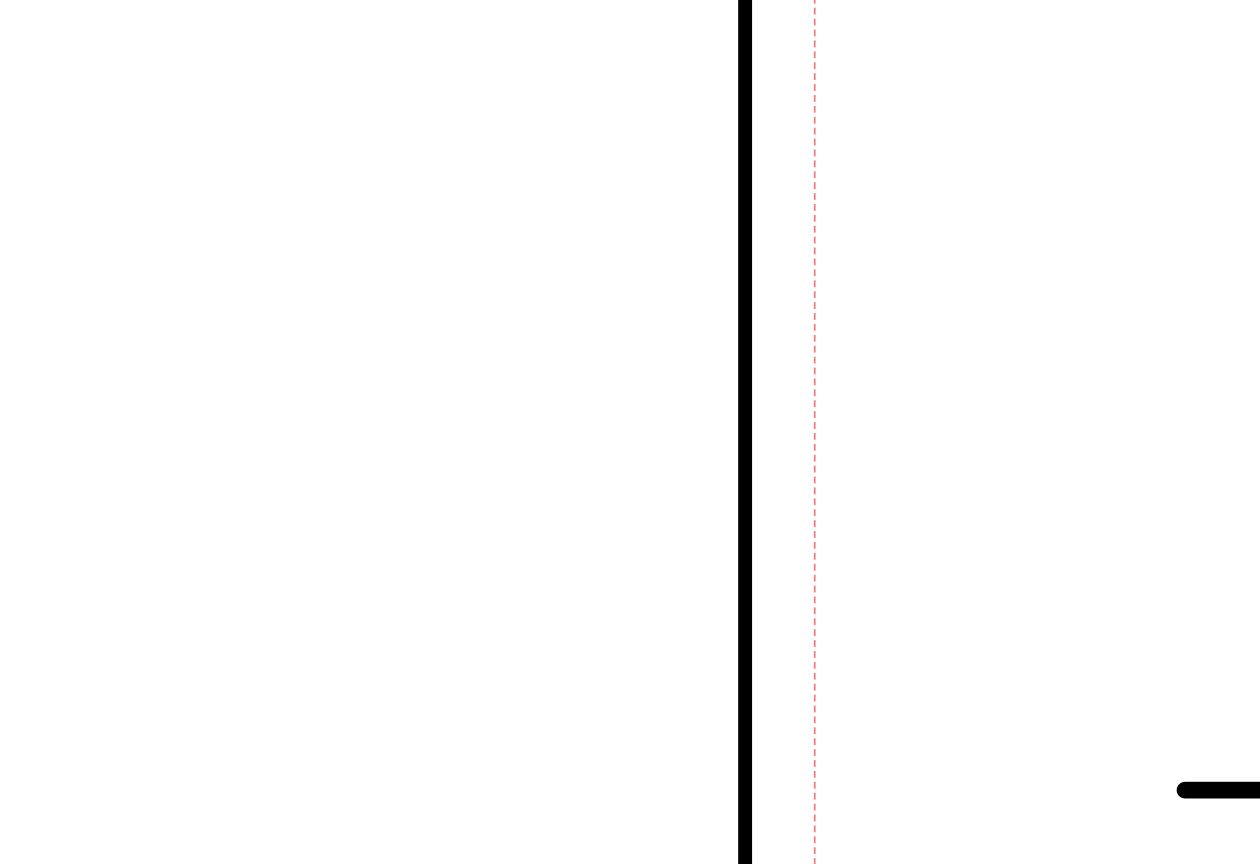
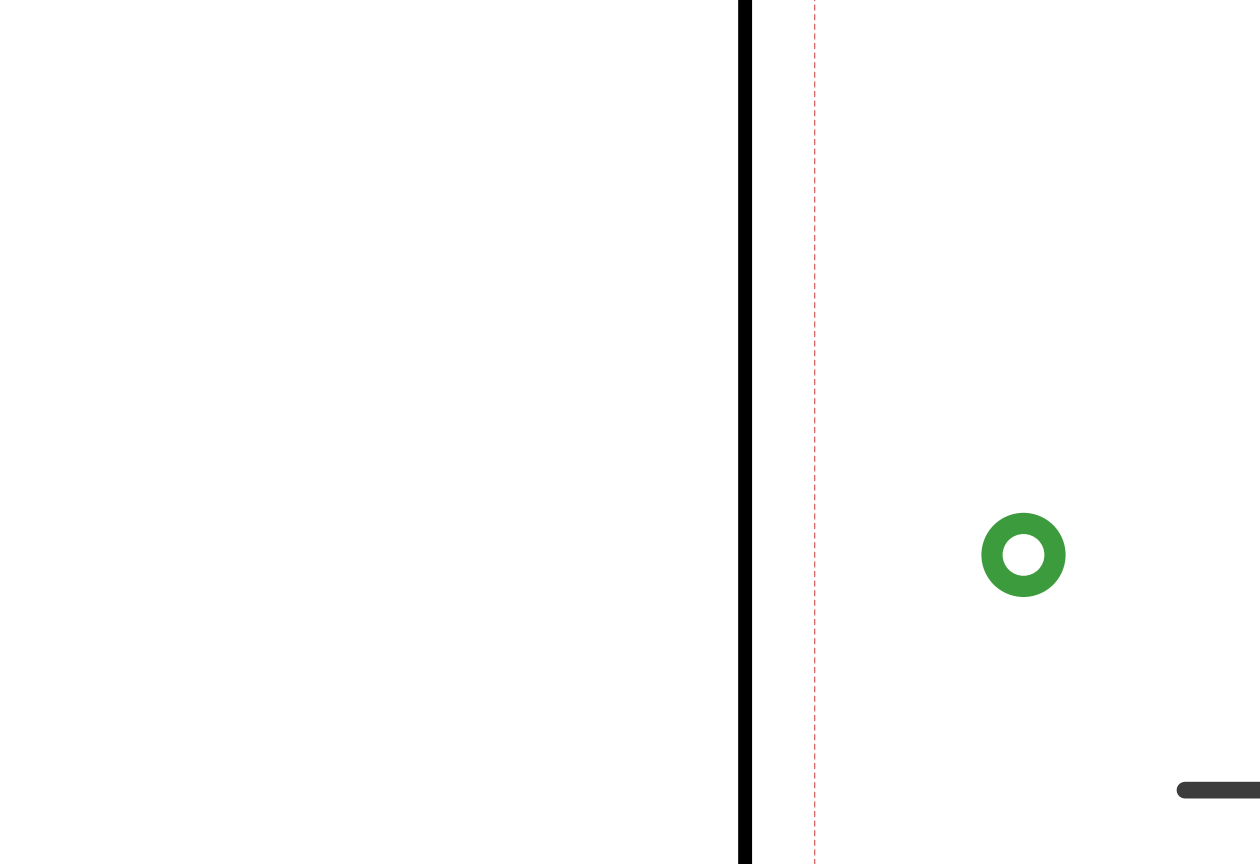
via: none -> (1023, 554)

